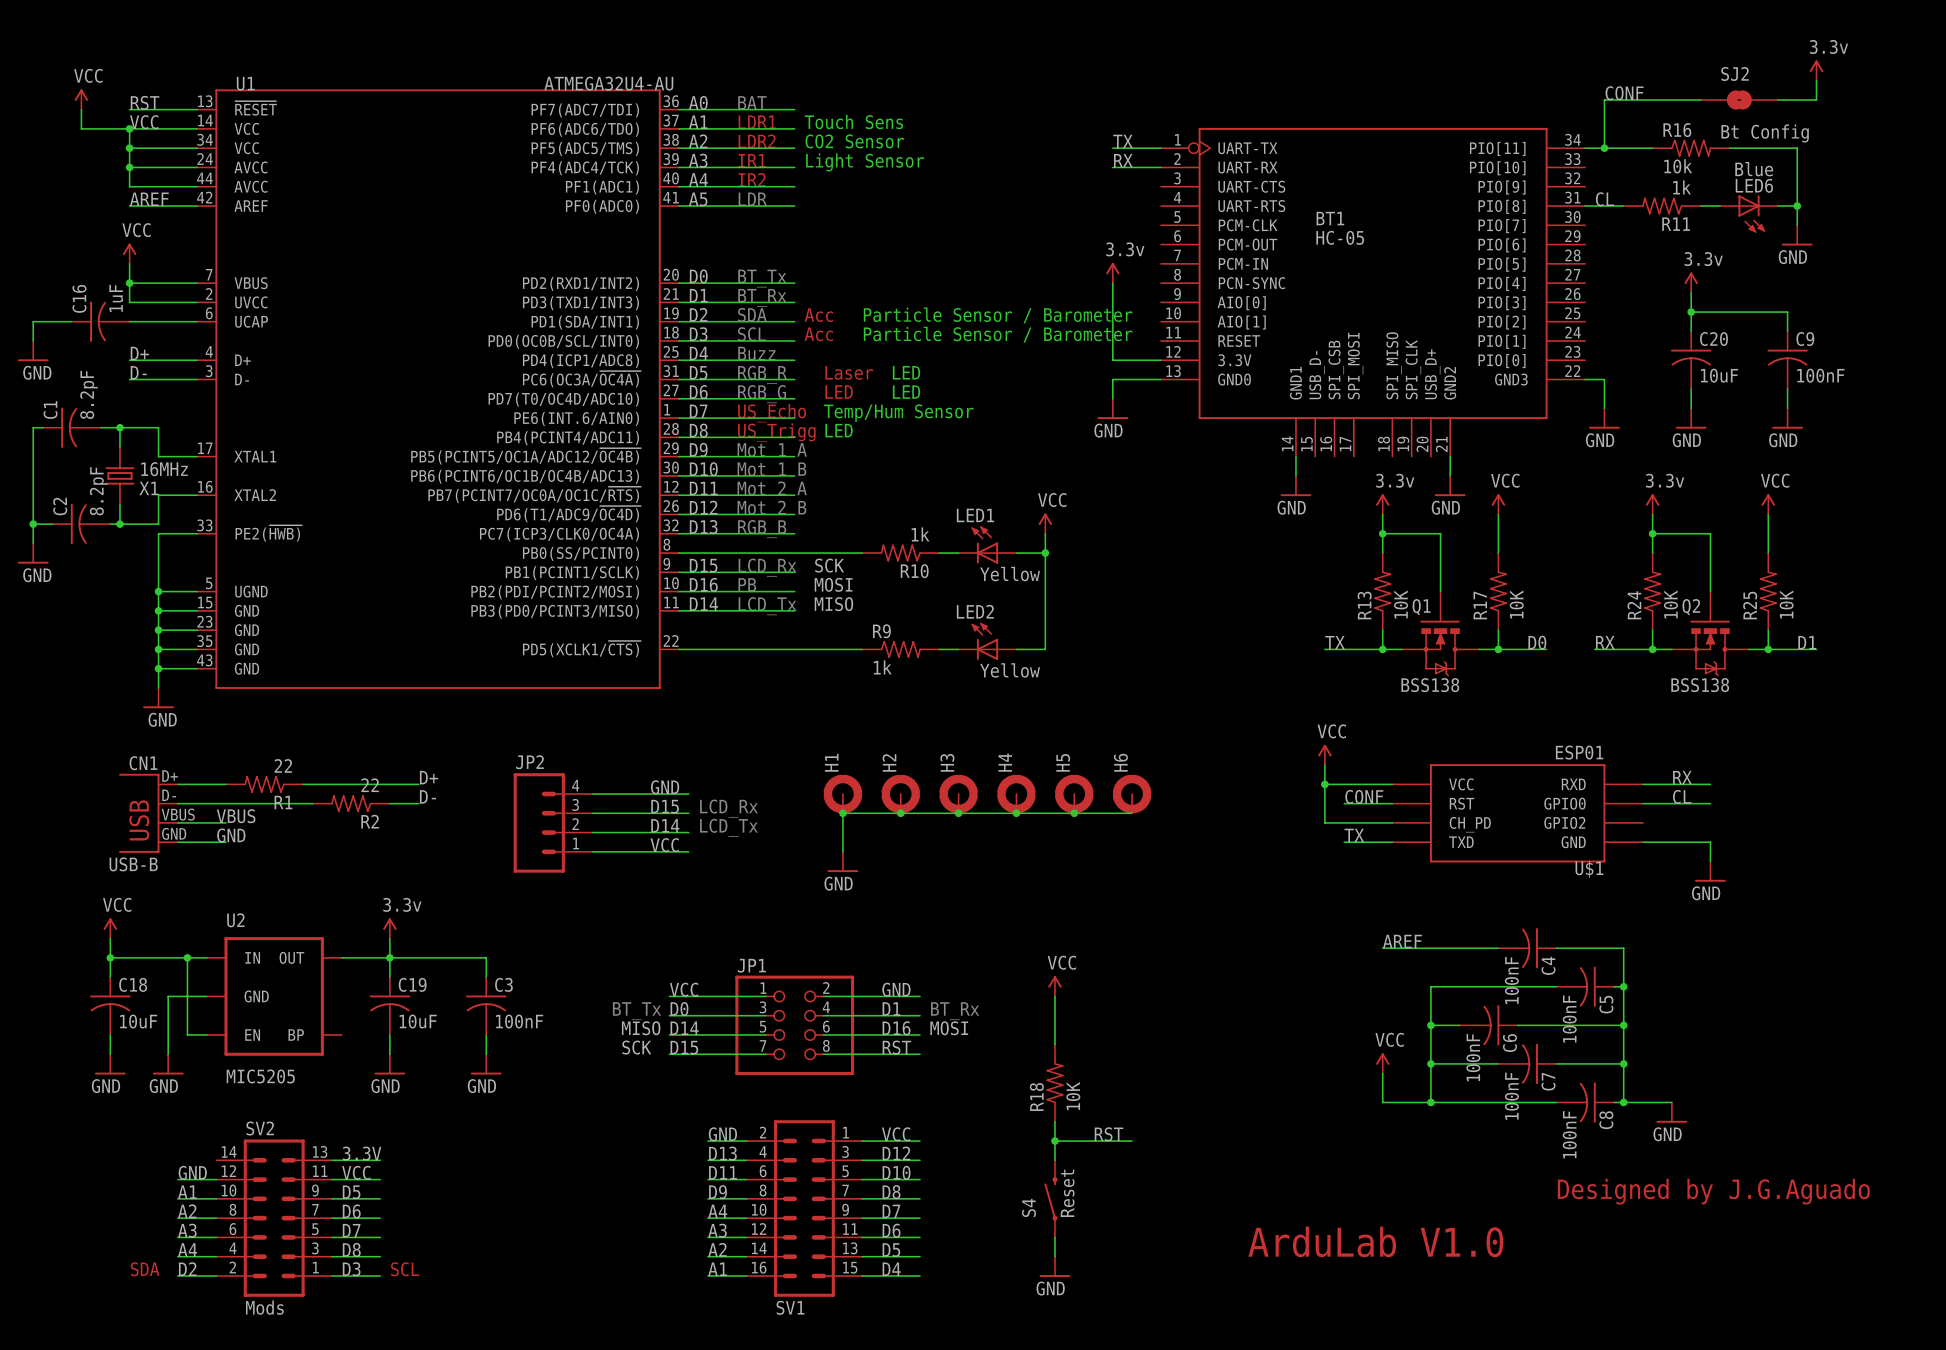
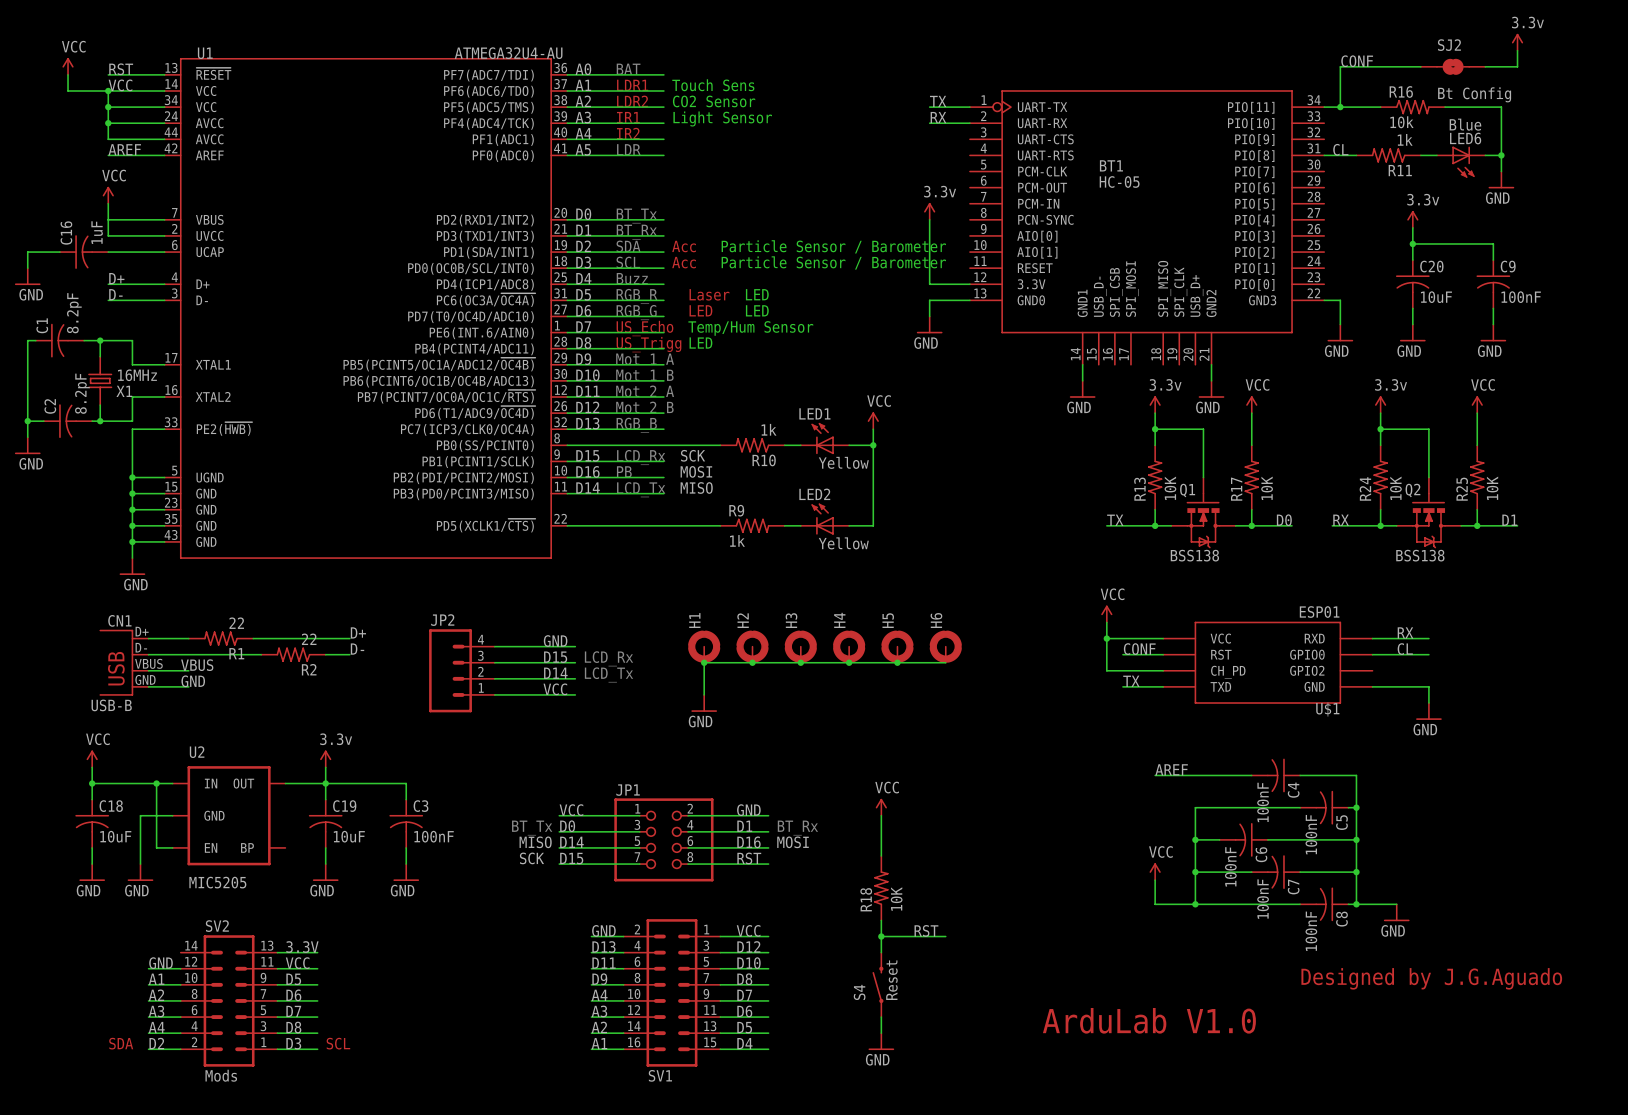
junction: (129, 283) -> none

